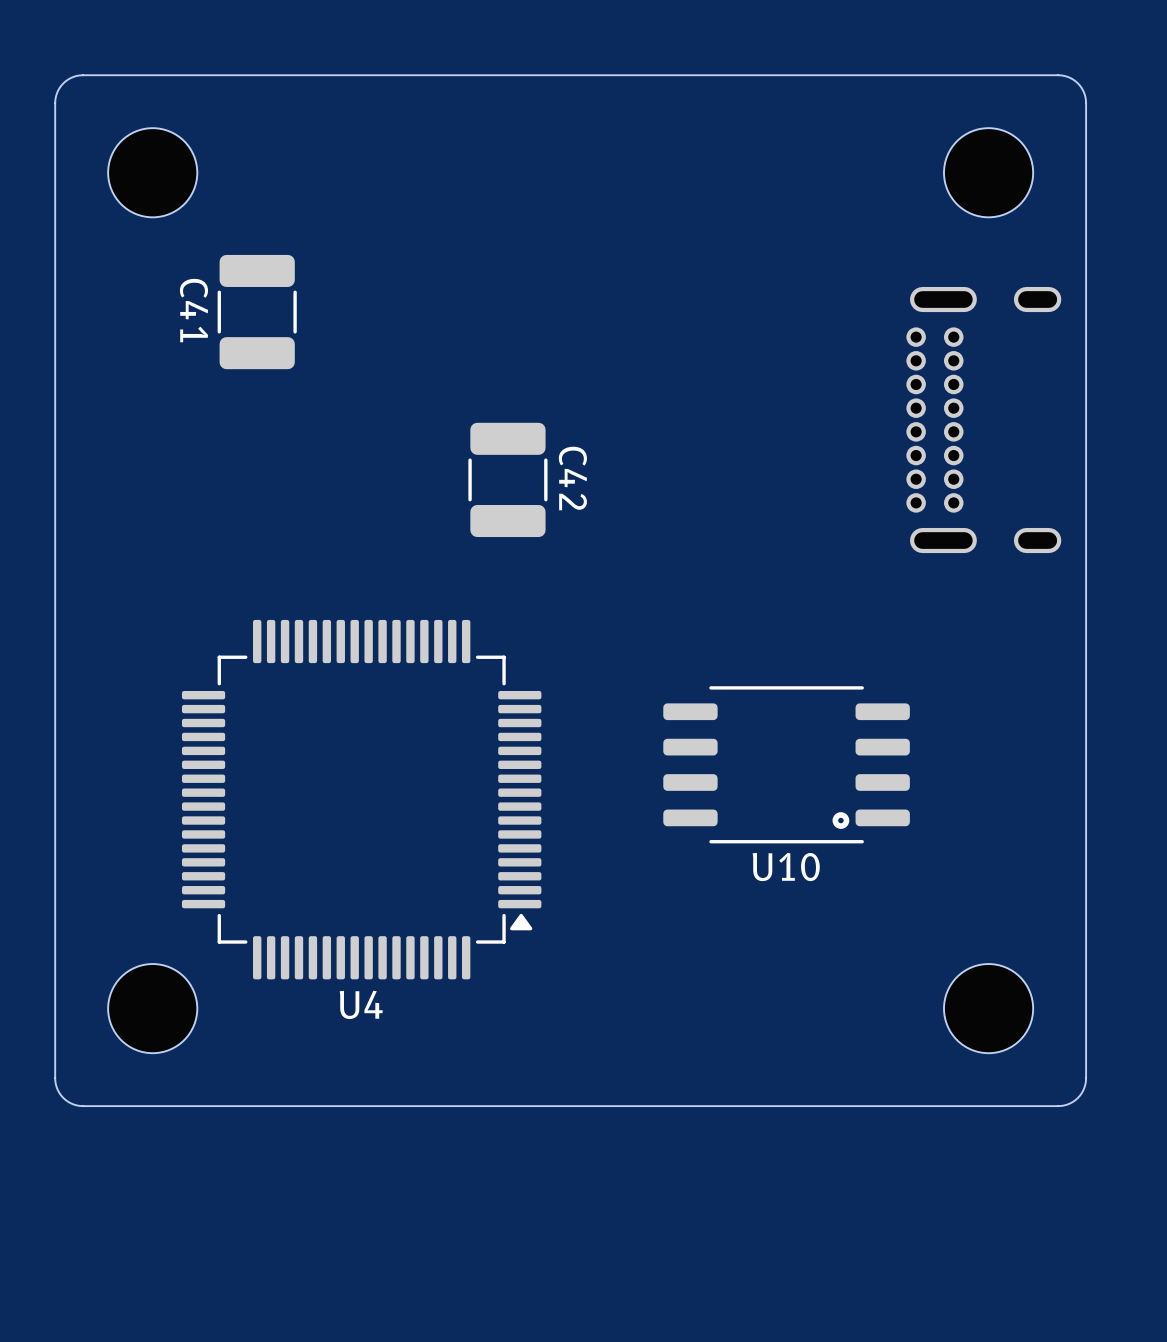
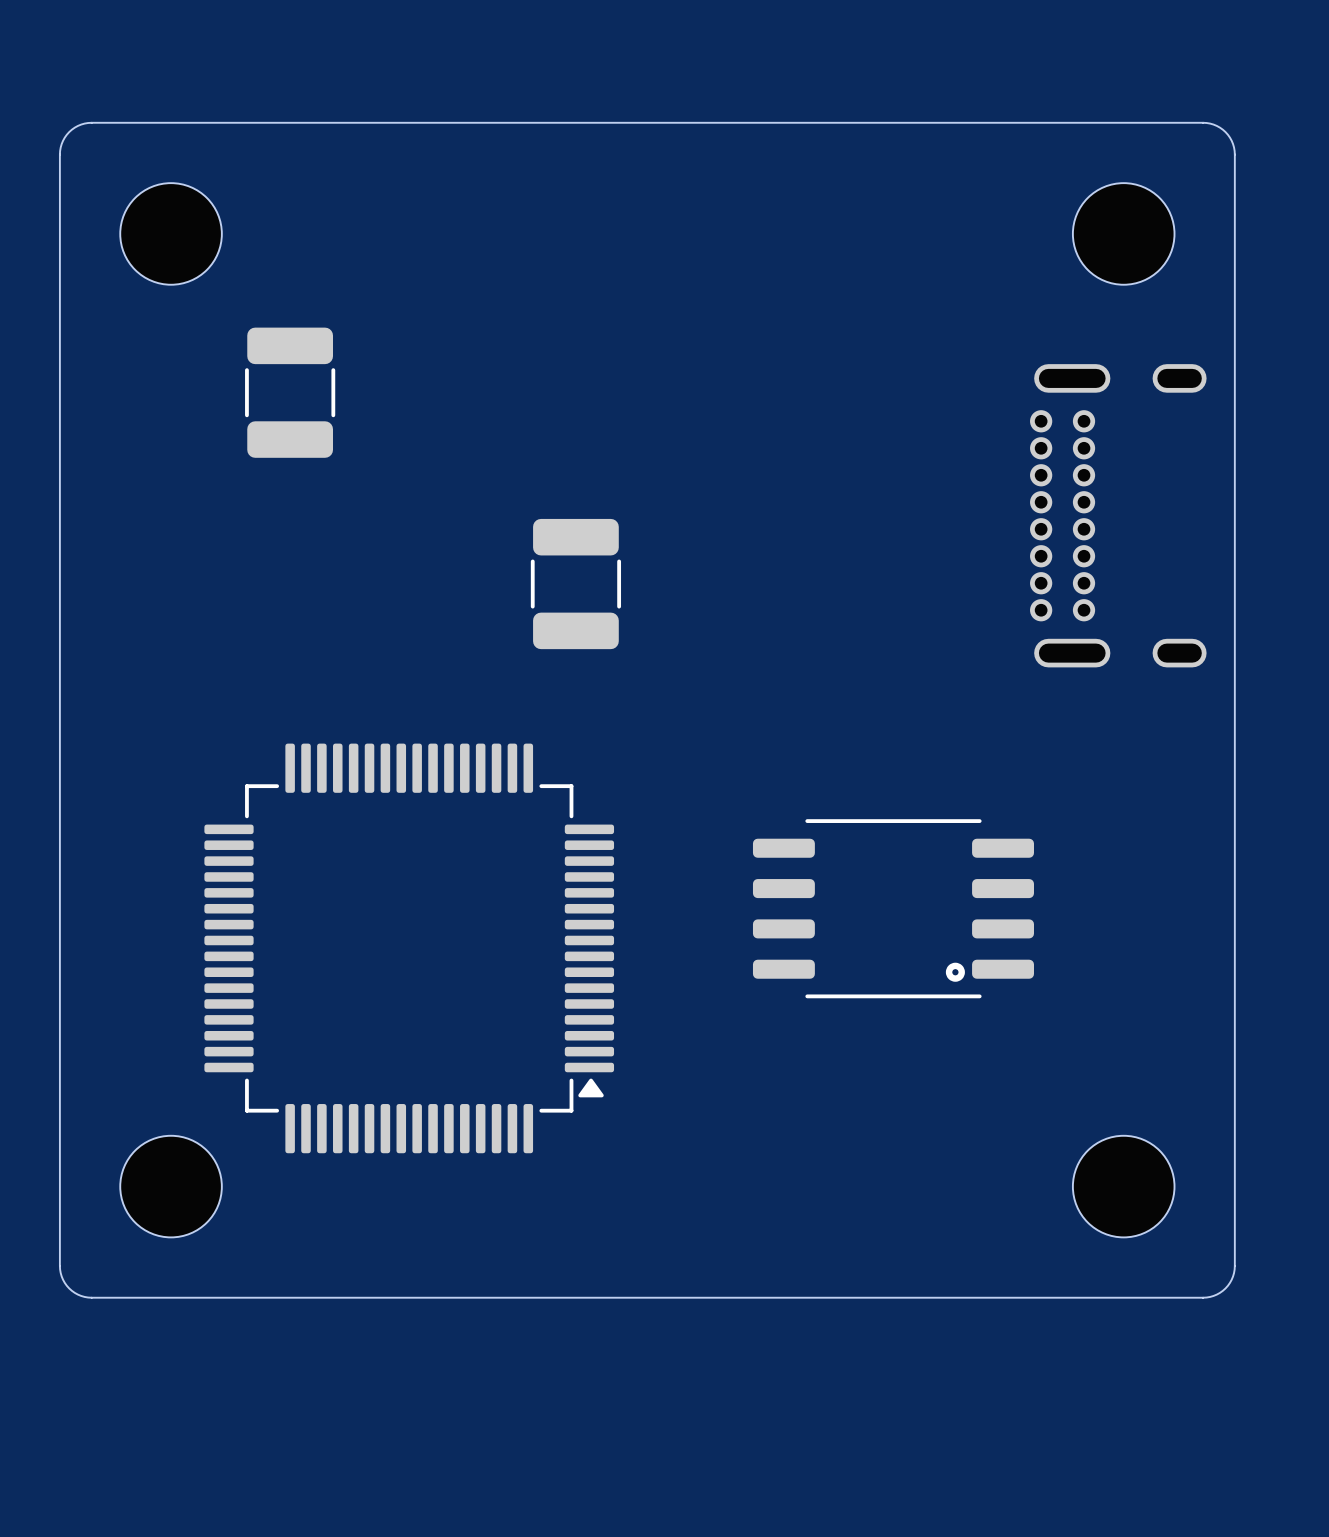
C41 name: C41 (194, 310) -> none
C42 name: C42 (572, 478) -> none
U10 name: U10 (786, 867) -> none
U4 name: U4 (361, 1004) -> none

